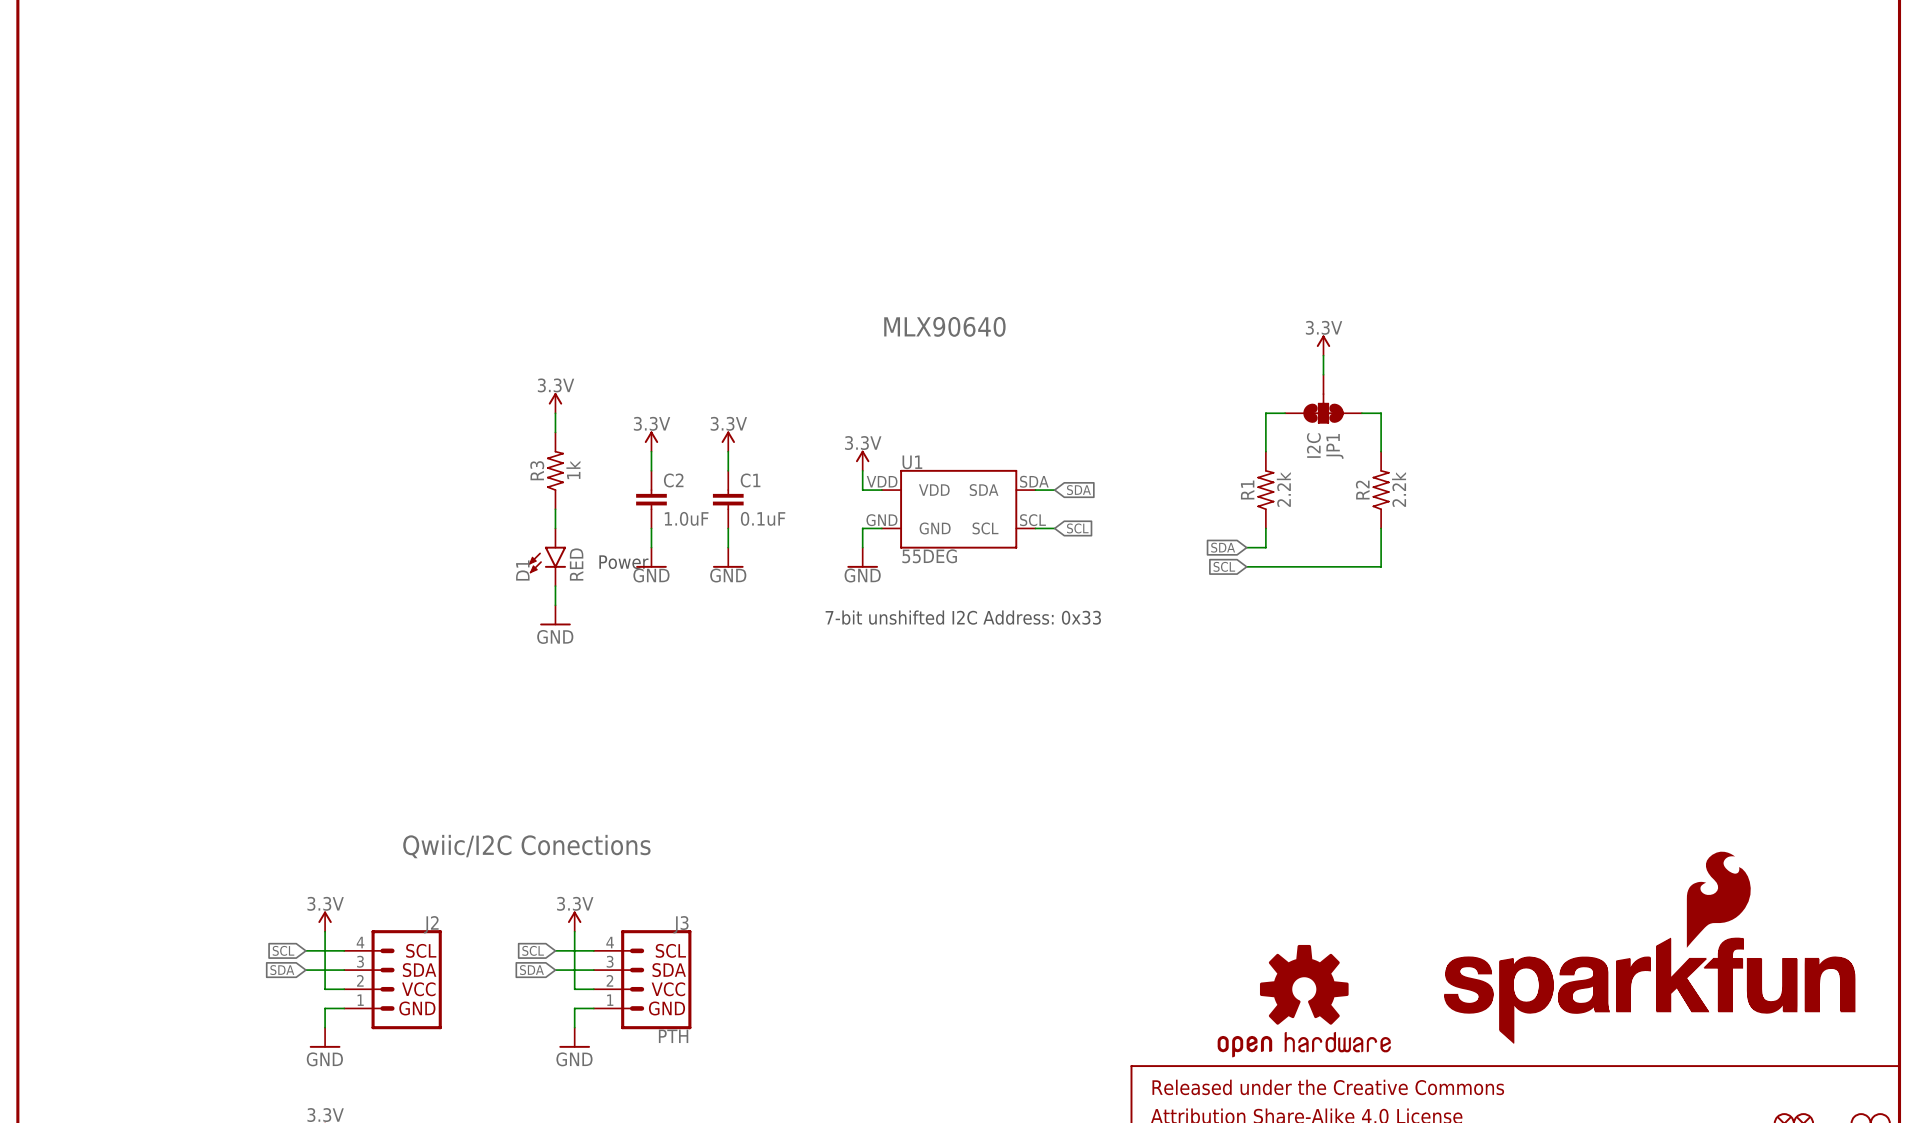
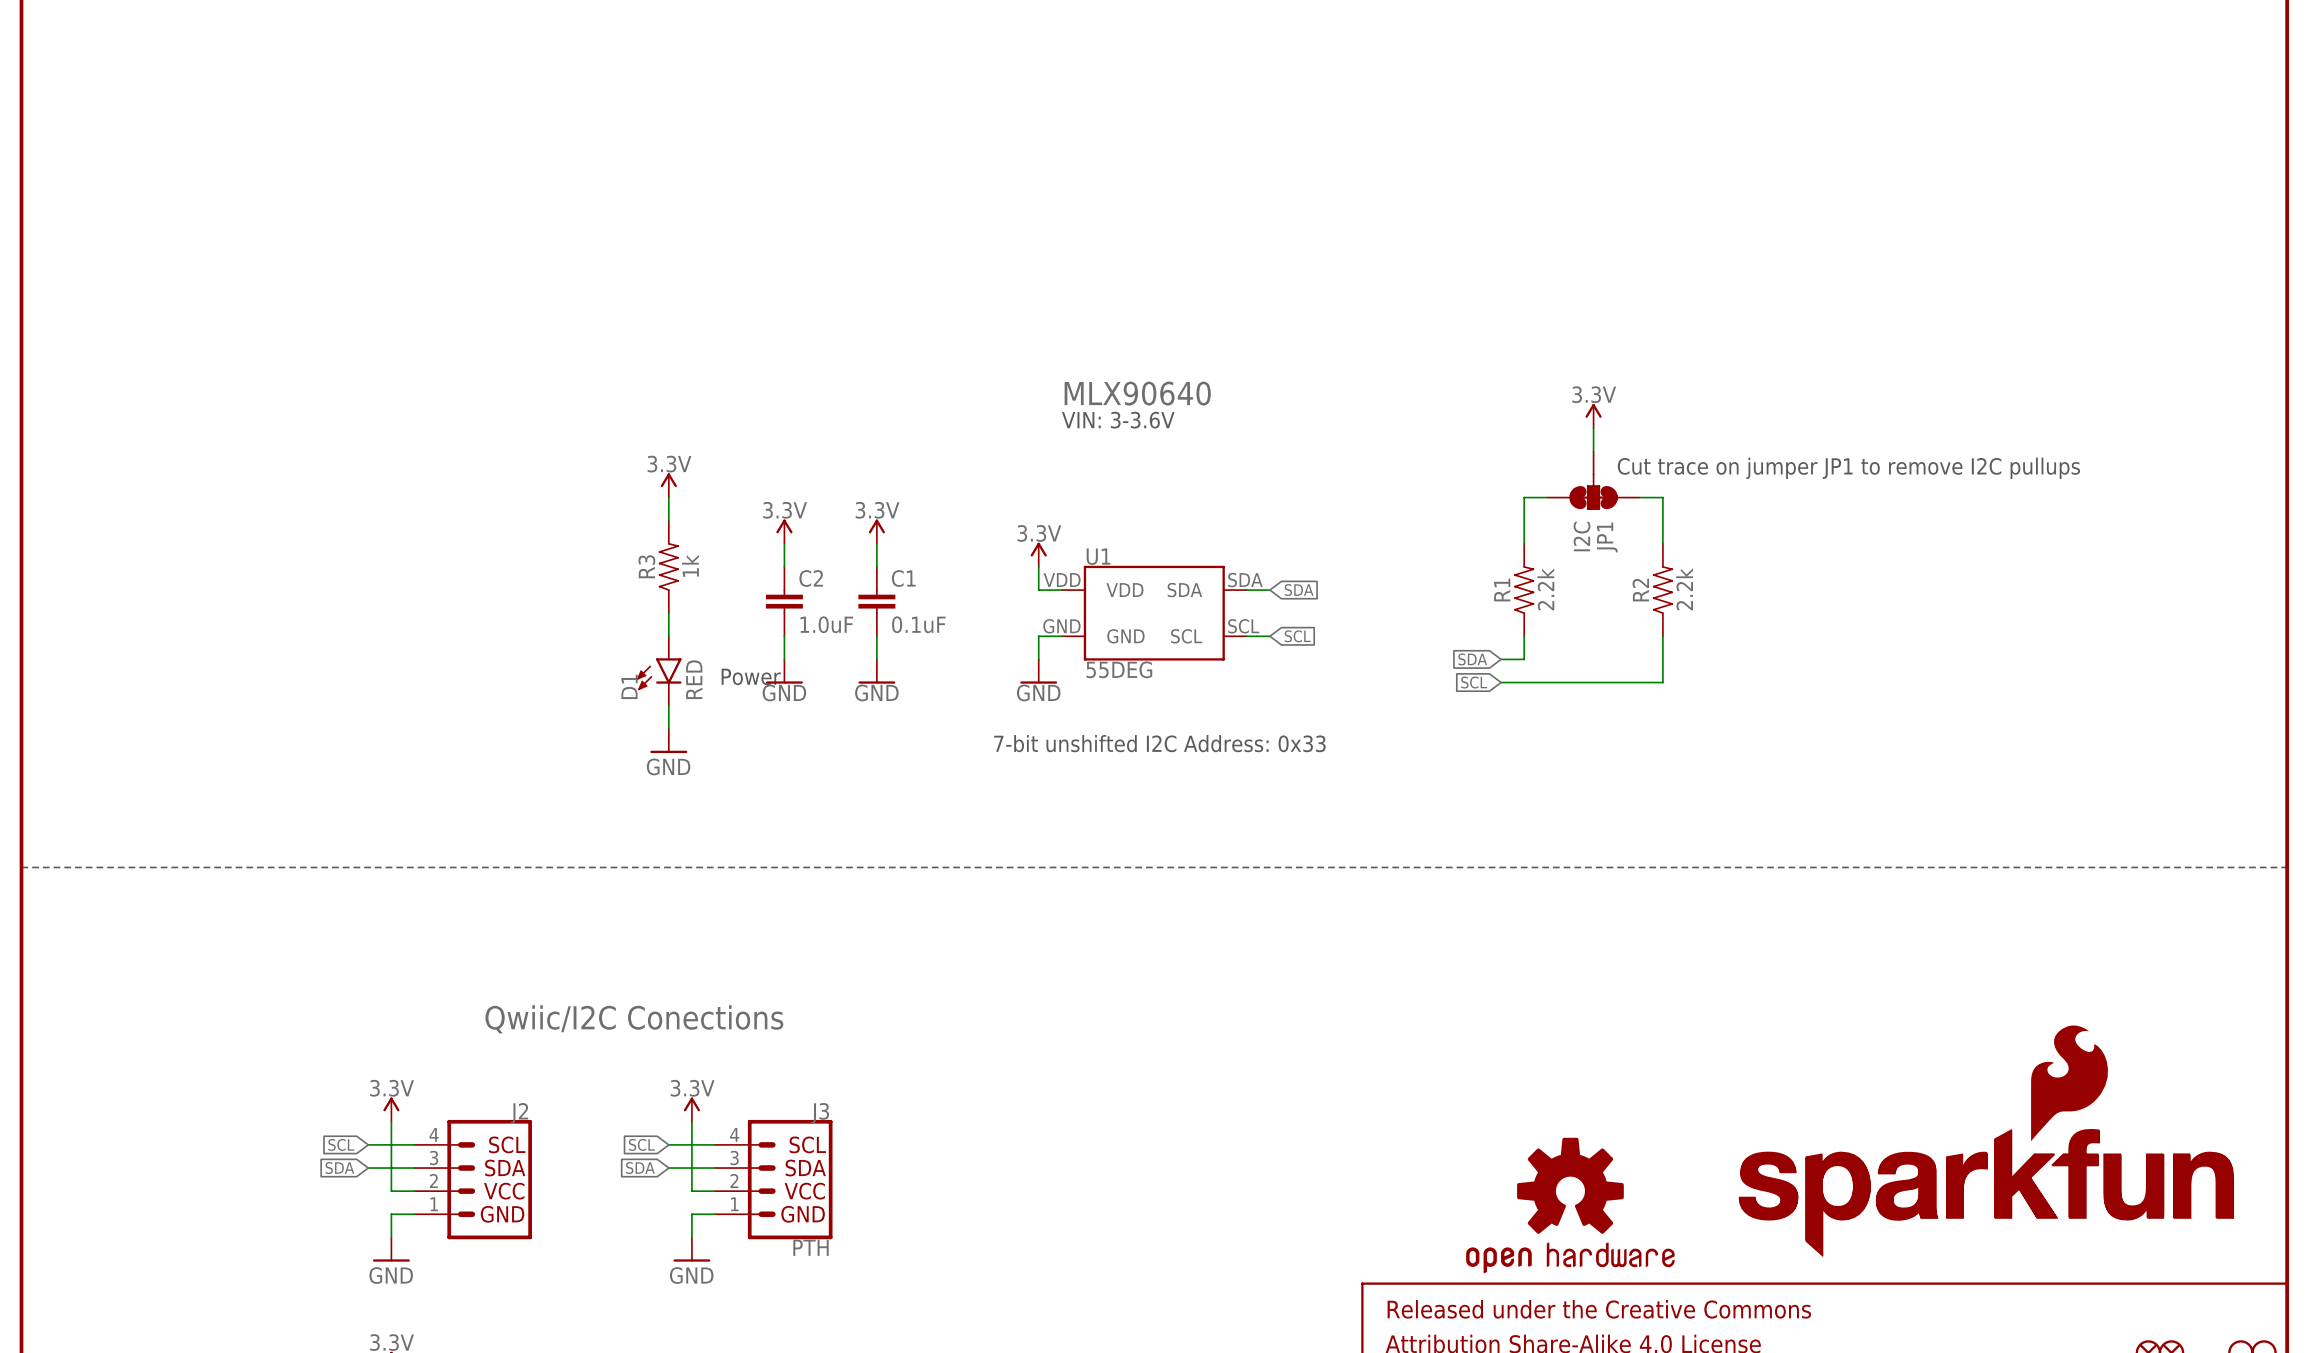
text: none -> VIN: 3-3.6V (1118, 420)
text: none -> Cut trace on jumper JP1 to remove I2C pullups (1848, 468)
line: none -> (21, 867) (2287, 867)

